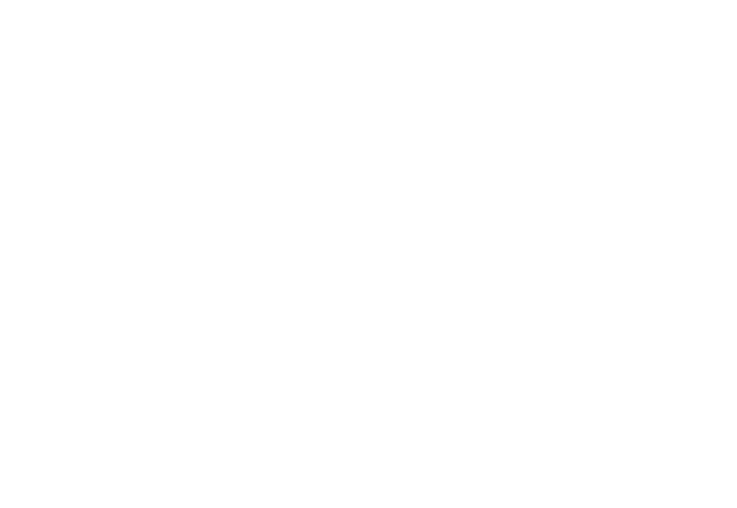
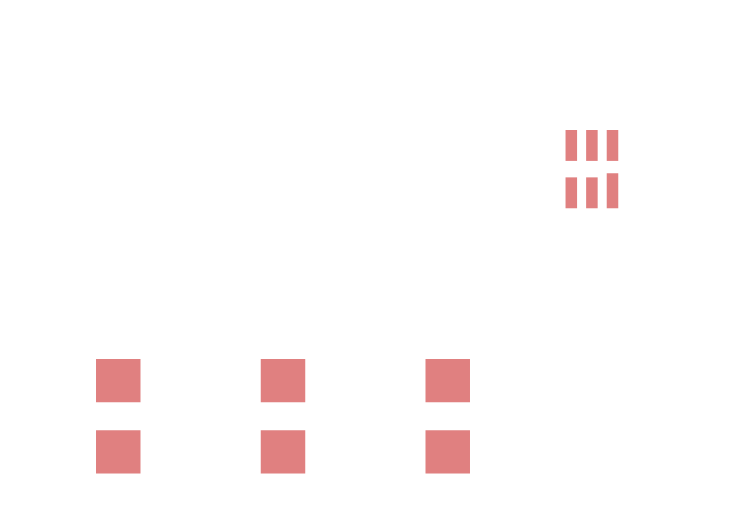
part: none -> (591, 169)
part: none -> (118, 416)
part: none -> (282, 416)
part: none -> (447, 416)

